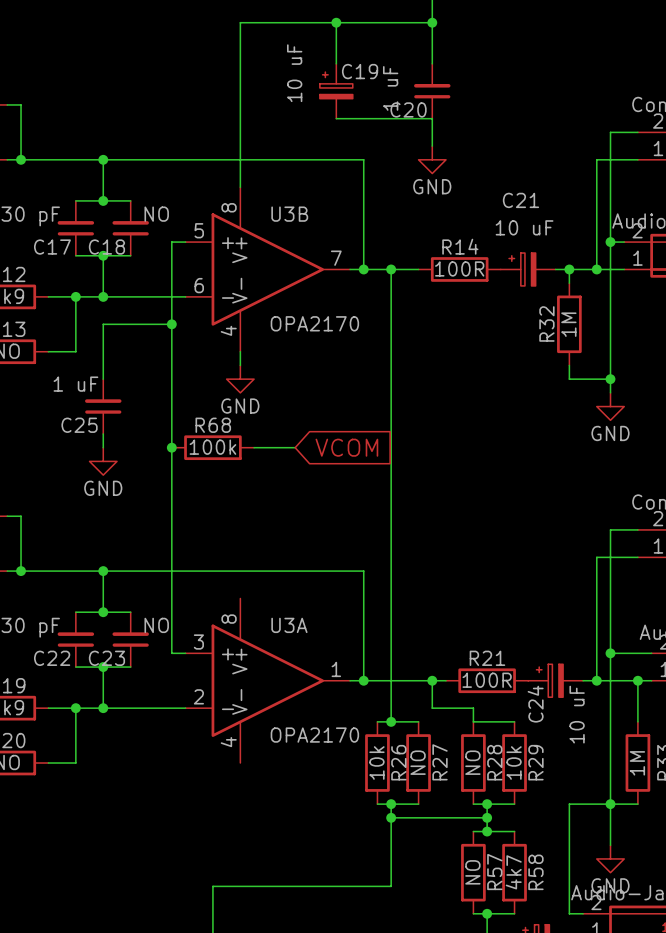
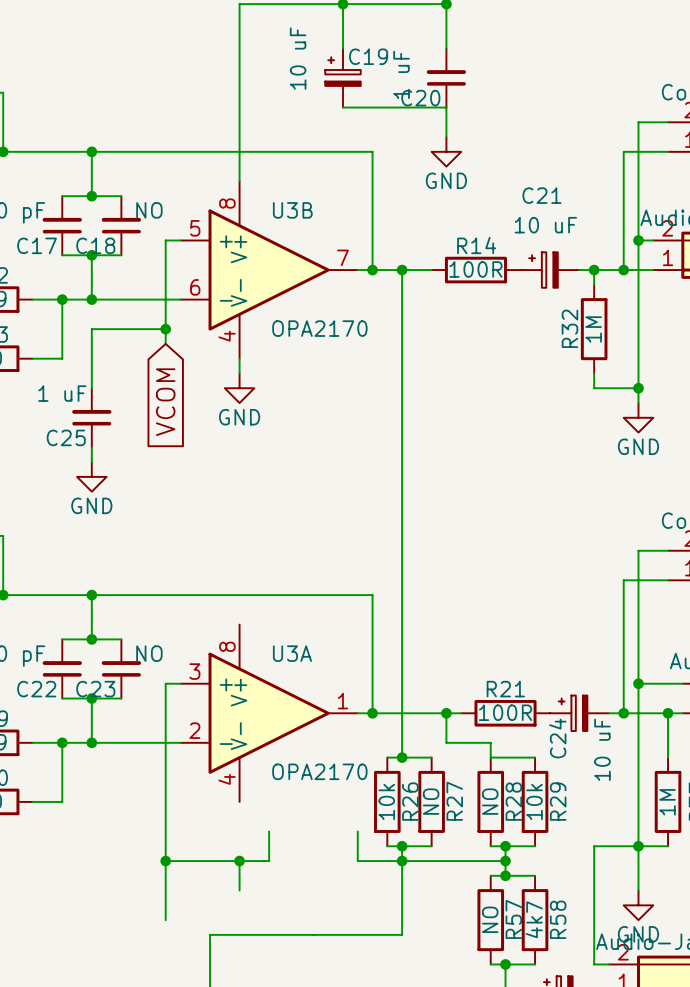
wire: (171, 338) (171, 653) -> (165, 920) (165, 683)
junction: (171, 447) -> none
R68: 100k (212, 447) -> none
wire: (254, 447) (295, 447) -> none
global label rotation: 0° (346, 447) -> 90° clockwise (165, 402)
global label position: VCOM (346, 447) -> VCOM (165, 402)
wire: none -> (269, 831) (269, 861) (165, 861)
wire: none -> (357, 831) (357, 861) (402, 861)
junction: none -> (165, 861)
wire: none -> (239, 861) (239, 890)
junction: none -> (239, 861)

